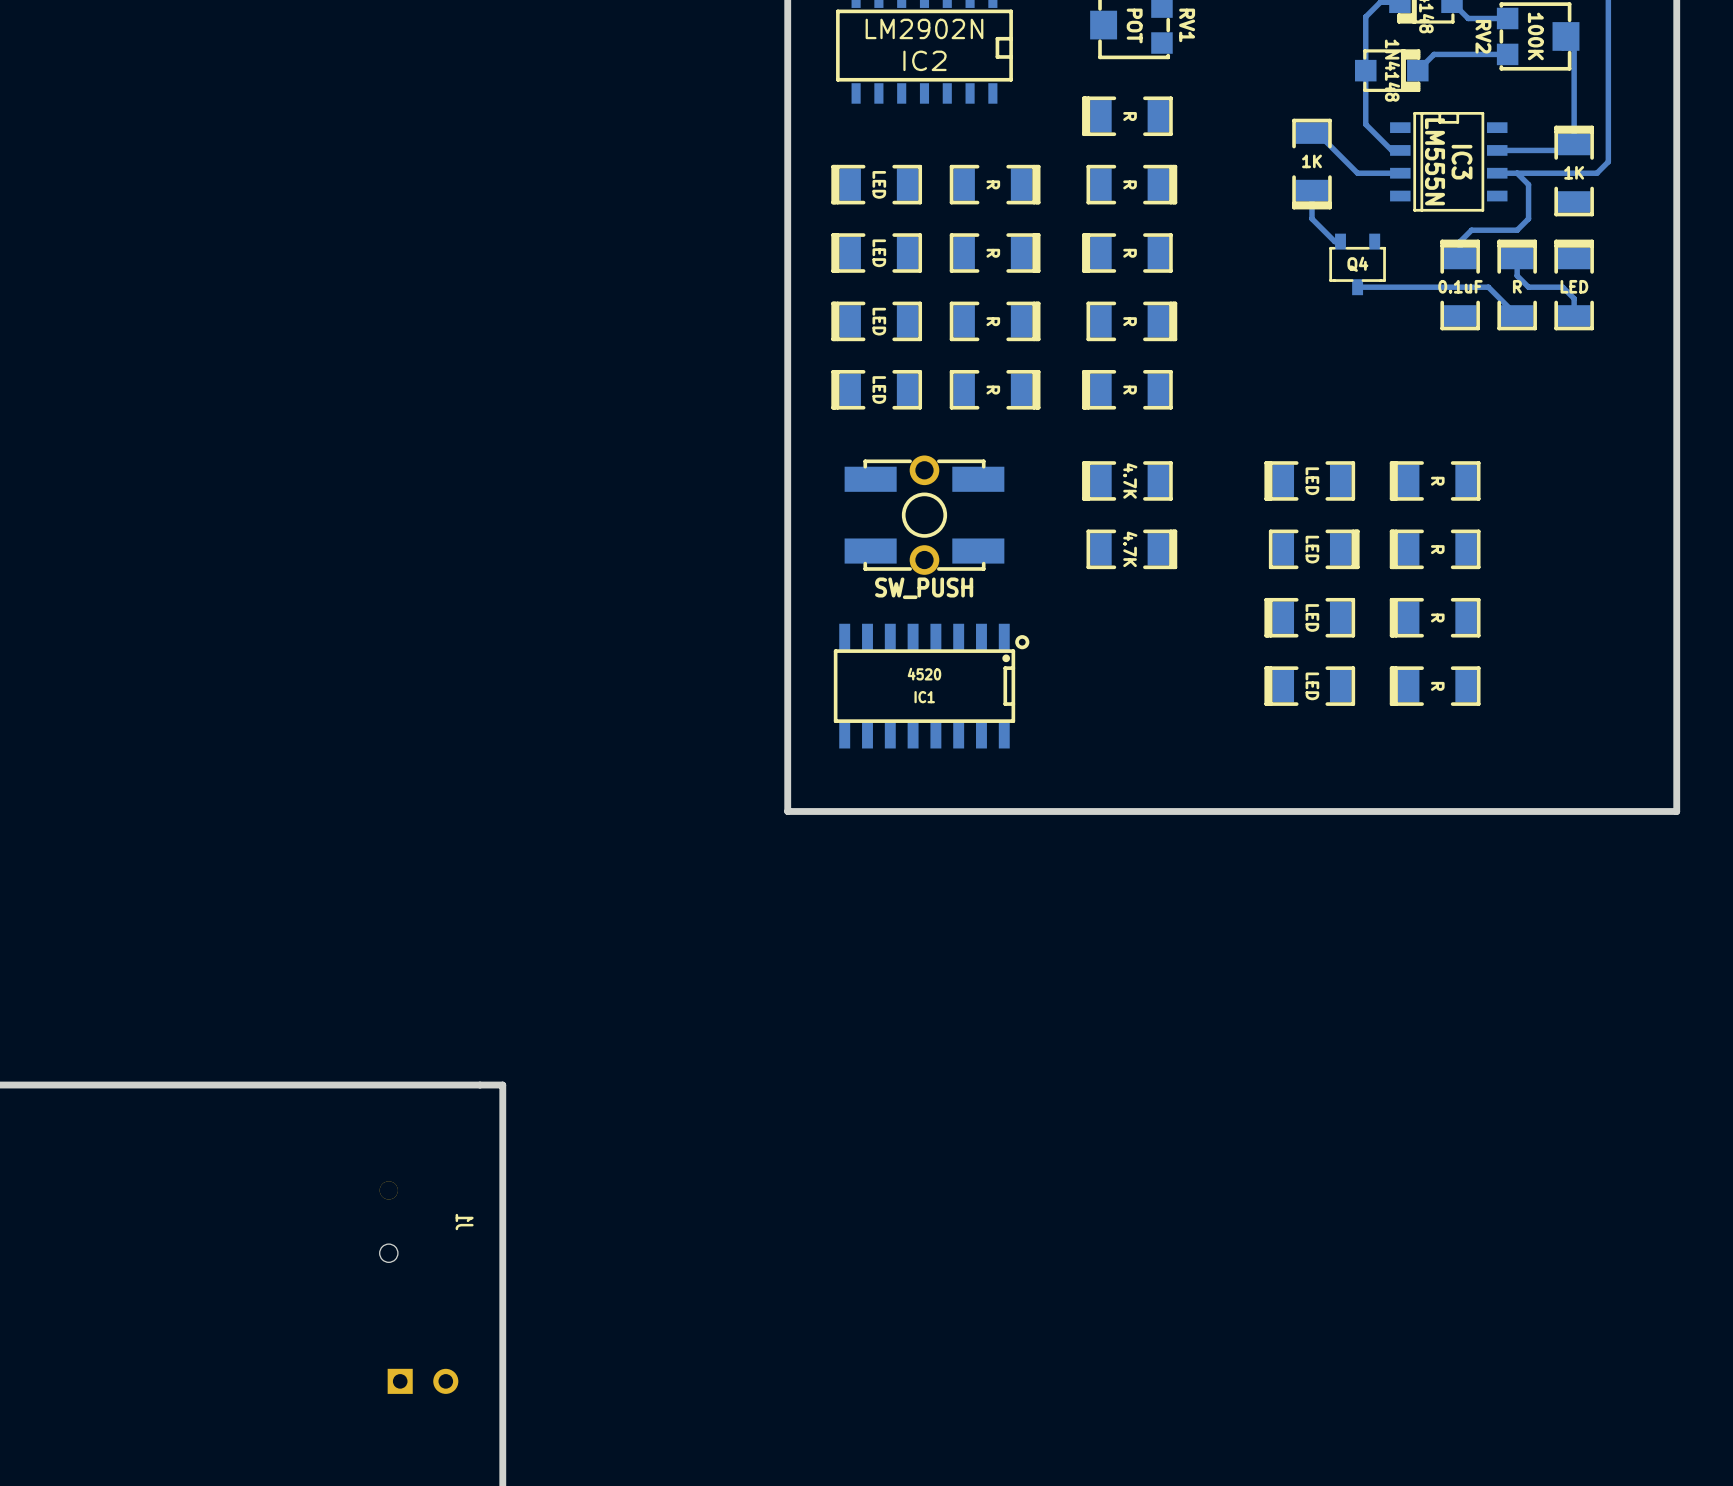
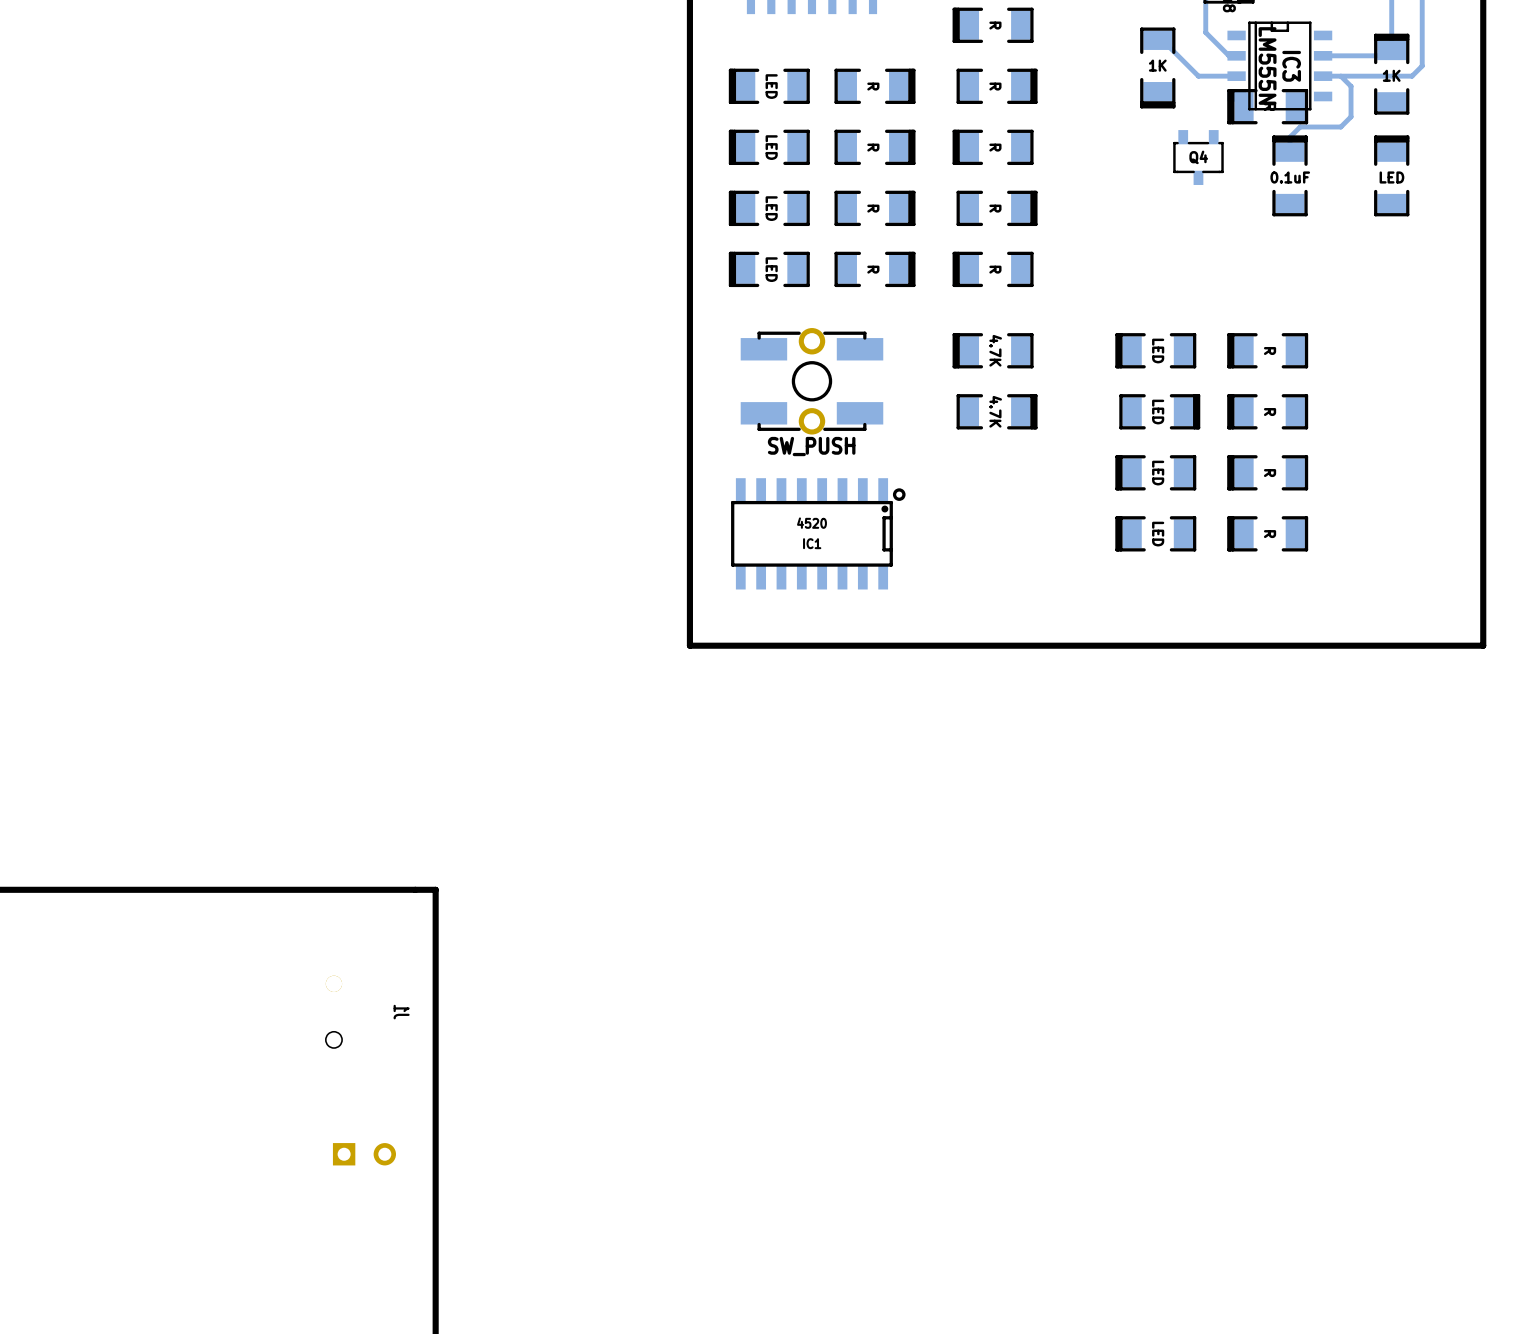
track: (1312, 190) (1312, 218) (1334, 241) (1340, 241) -> none
track: (1517, 258) (1517, 275) (1528, 287) (1562, 287) (1574, 298) (1574, 315) -> none
part rotation: 0° (1517, 284) -> 90° counterclockwise (1267, 106)
part position: (1517, 284) -> (1267, 106)
track: (1357, 287) (1488, 287) (1517, 315) -> none

